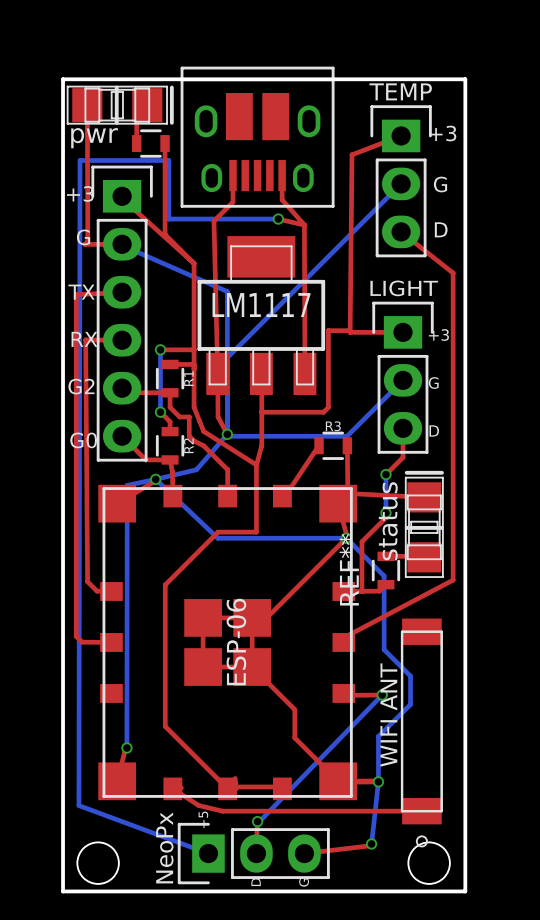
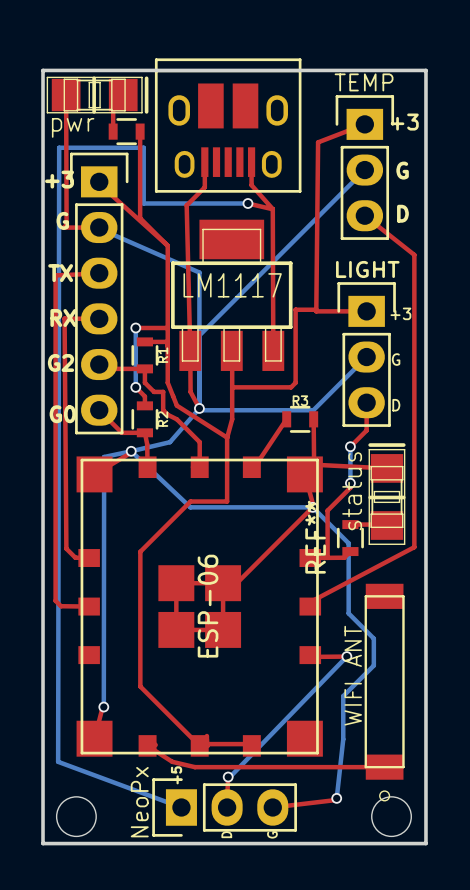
top track: (252, 667) (294, 709) (294, 737) (338, 781) (378, 781) (339, 782) -> none
via: (378, 781) -> none

